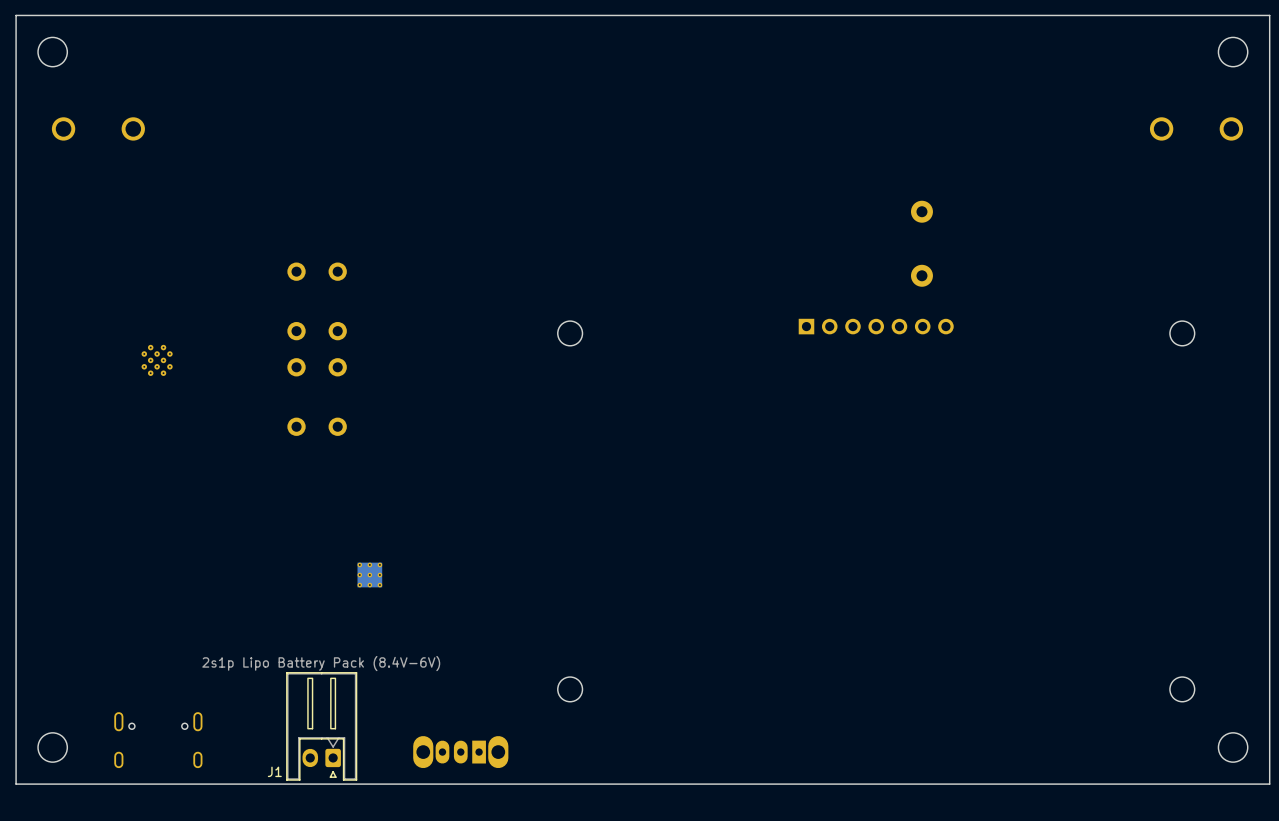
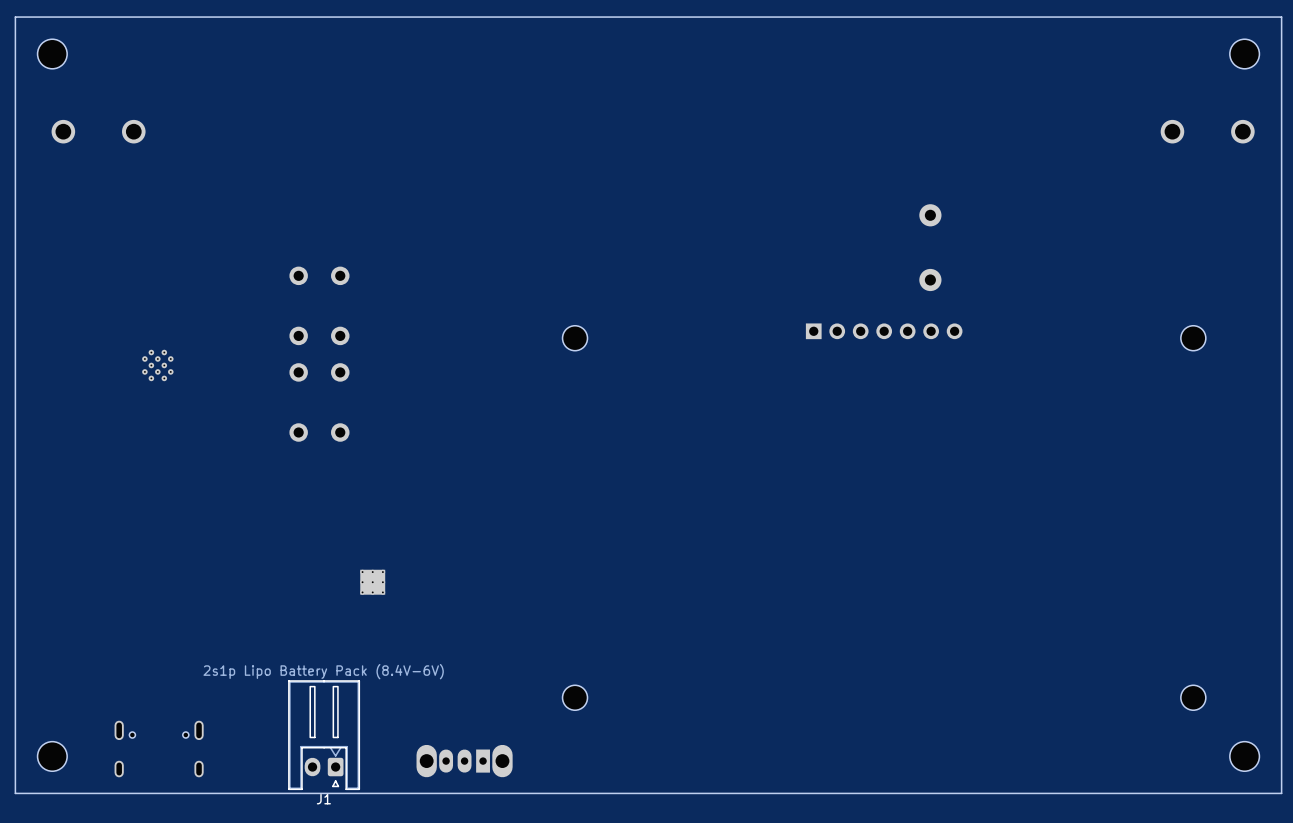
J1 name position: J1 (274, 771) -> J1 (323, 799)

